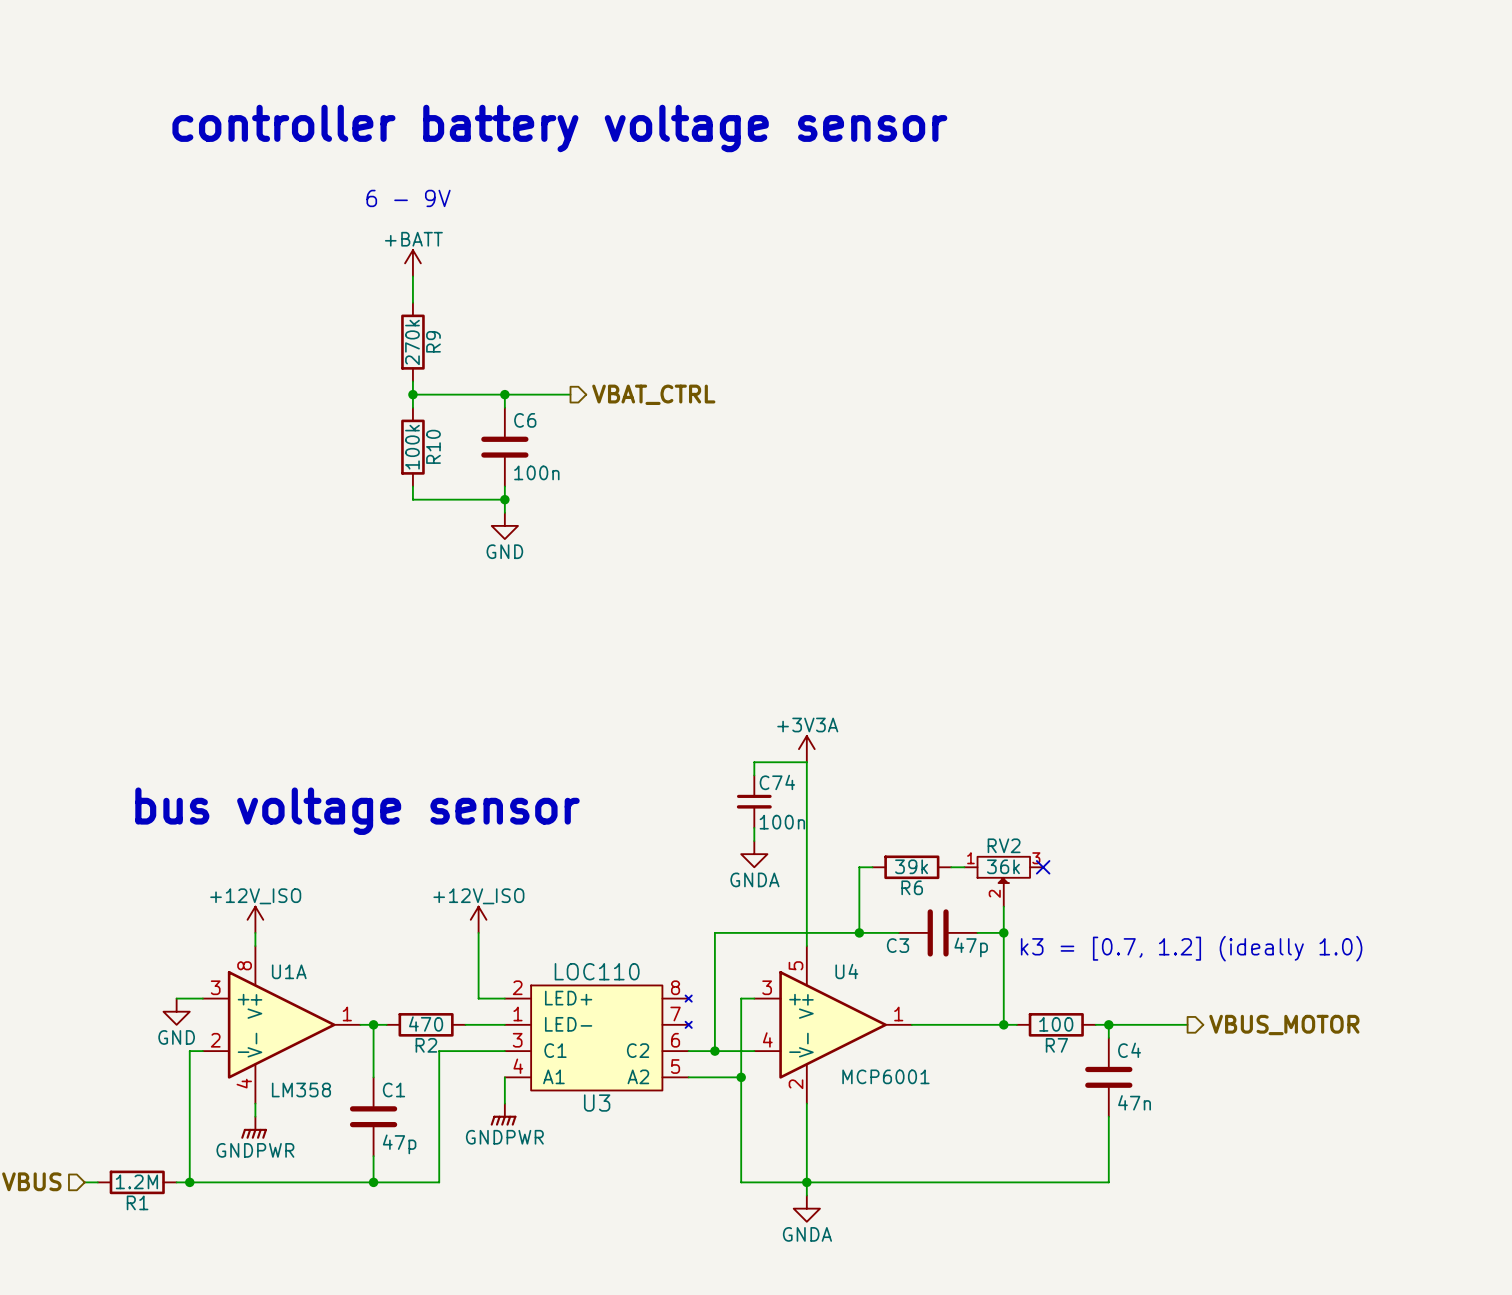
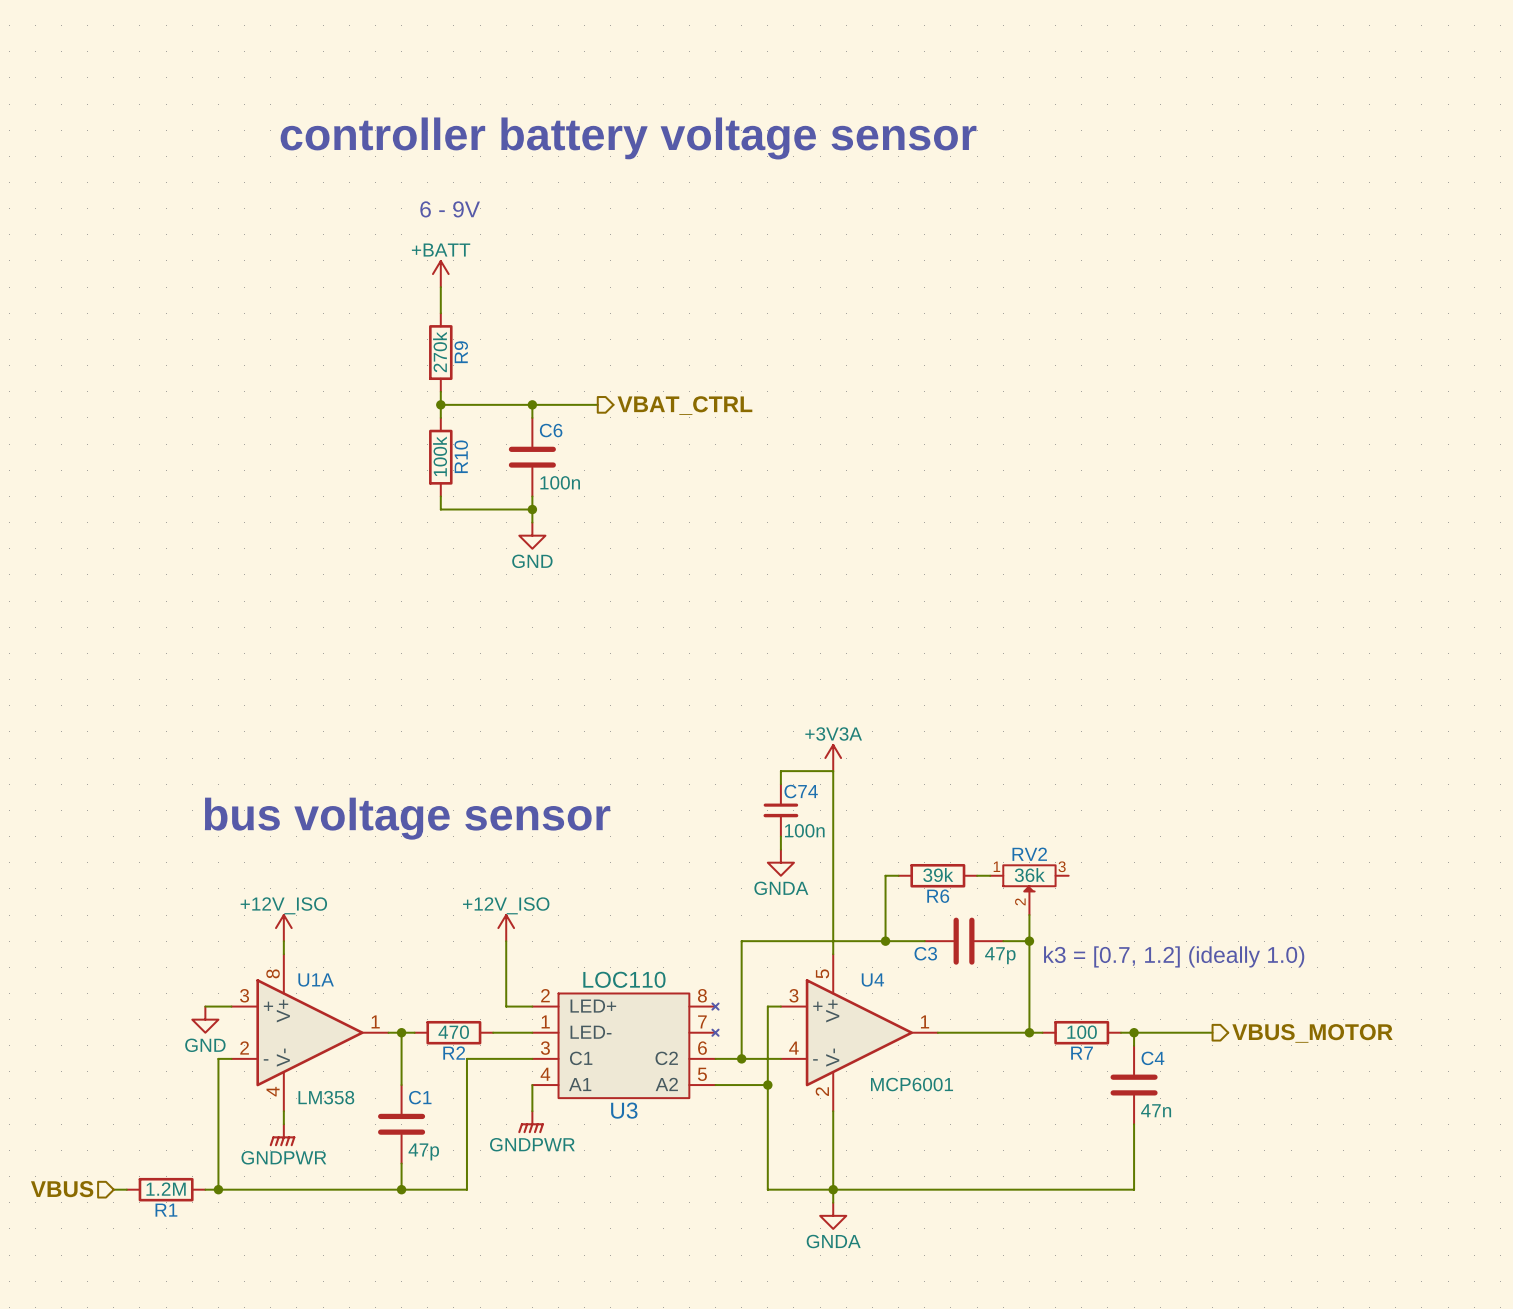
no-connect mark: (1043, 867) -> none

